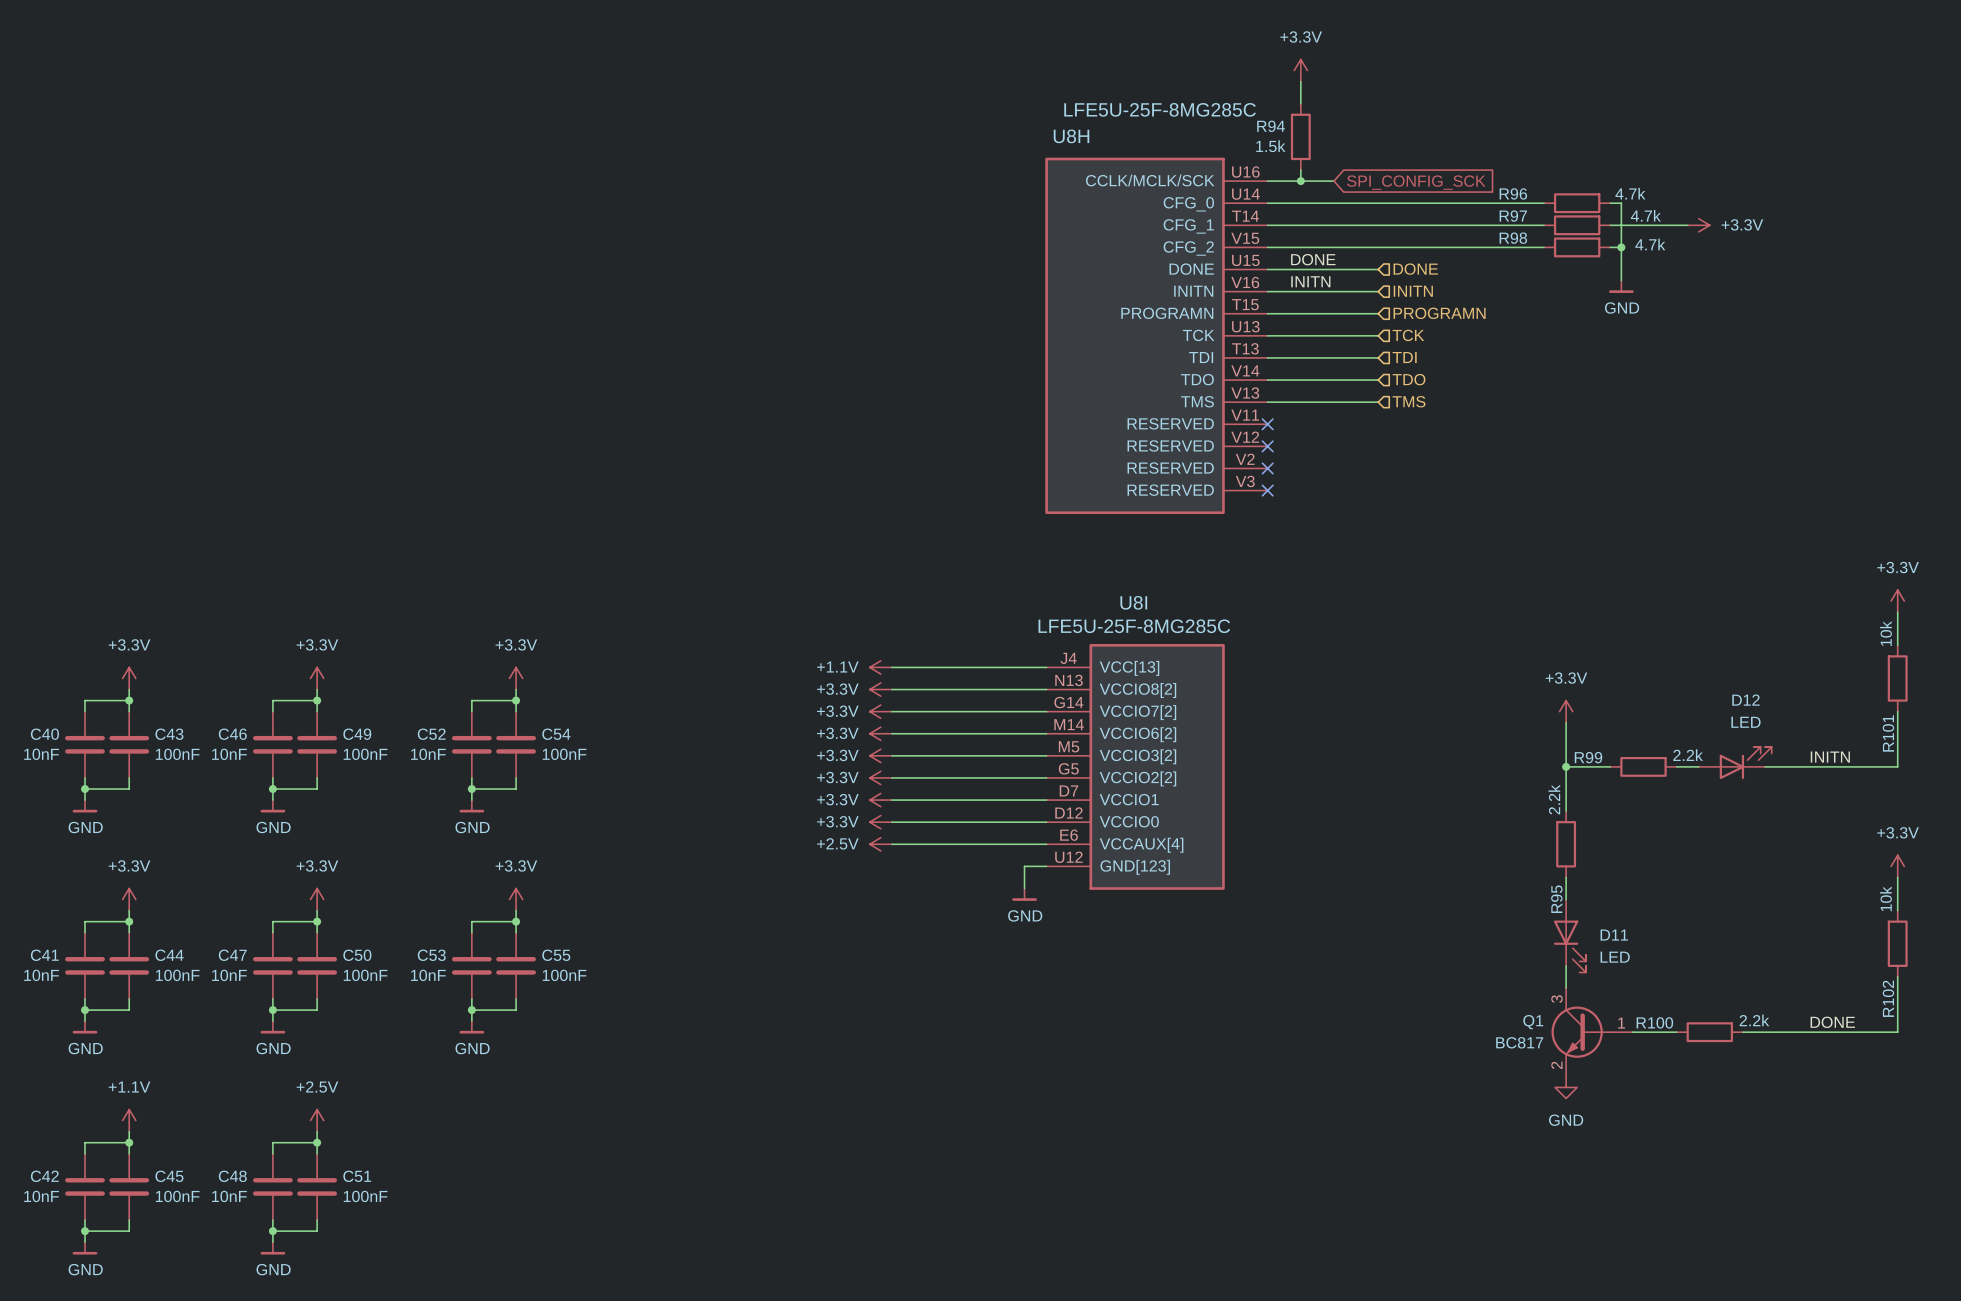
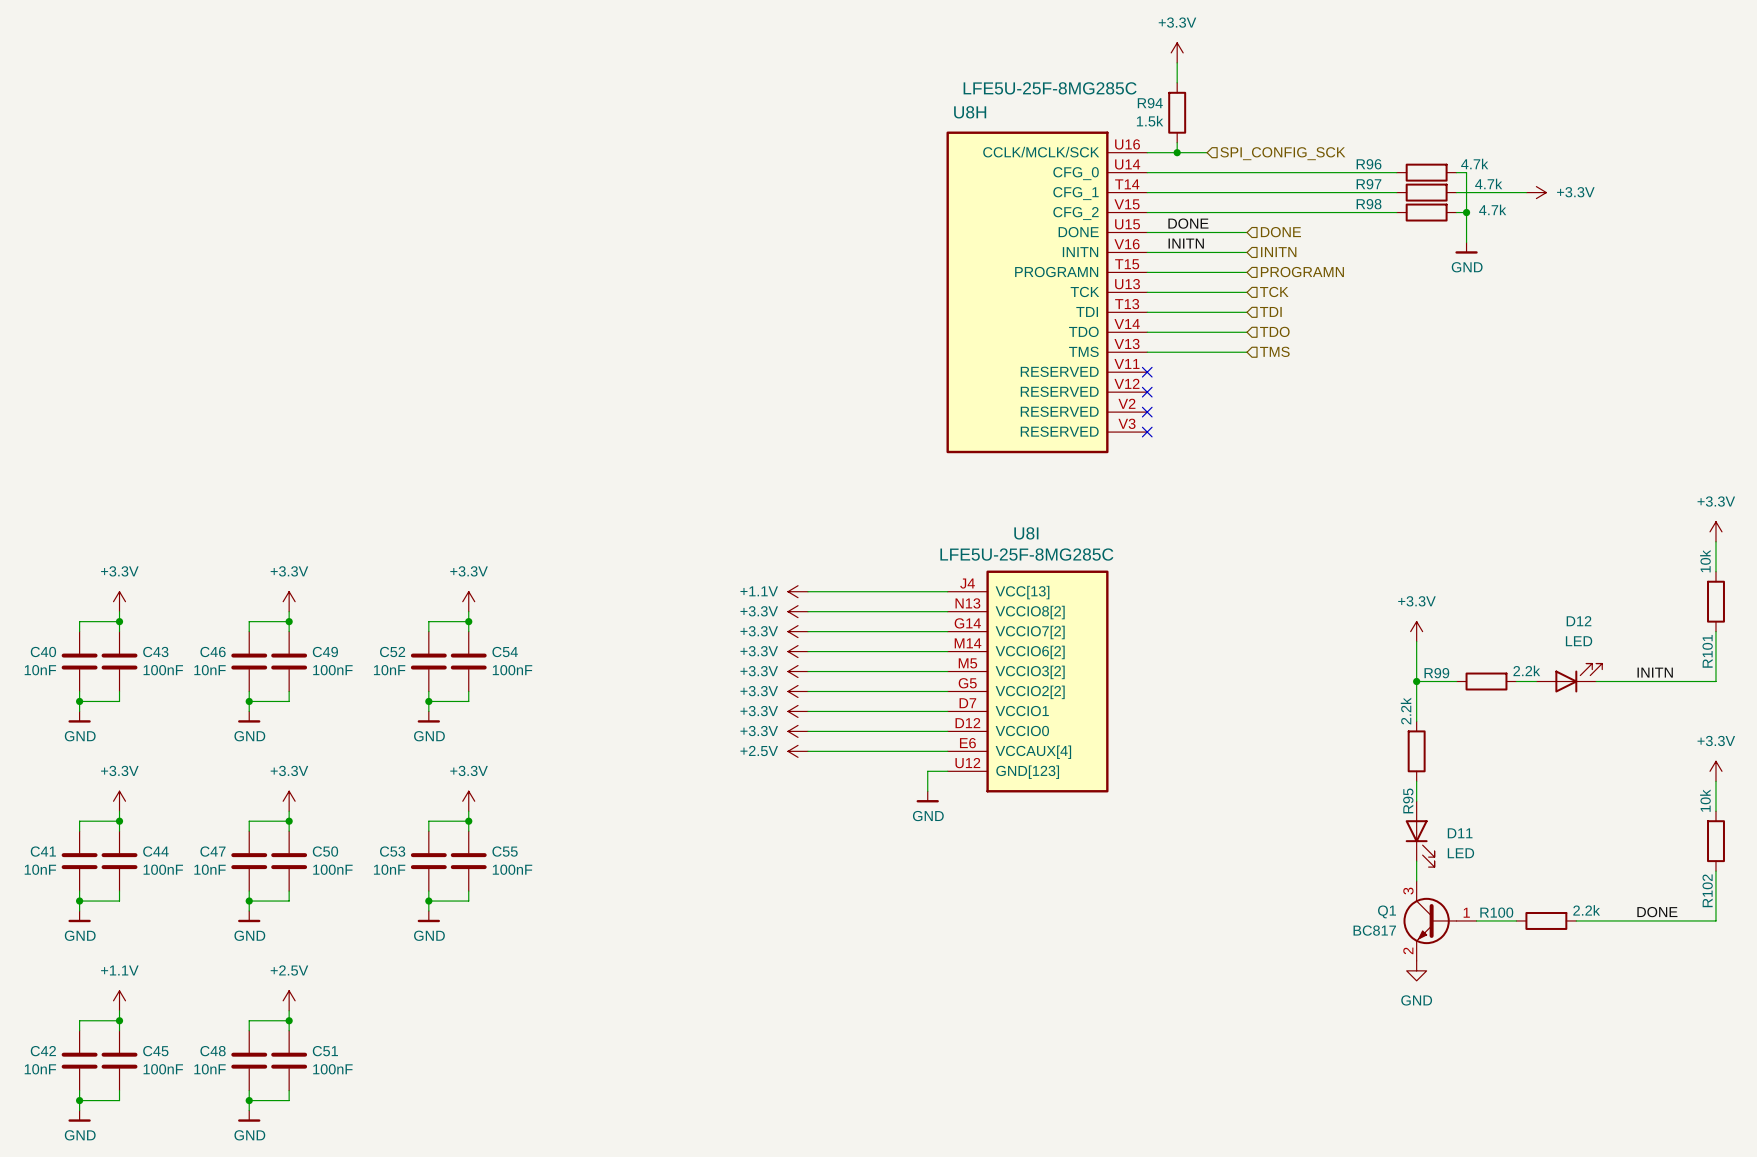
global label: SPI_CONFIG_SCK (1416, 182) -> none
hierarchical label: none -> SPI_CONFIG_SCK (1282, 153)

